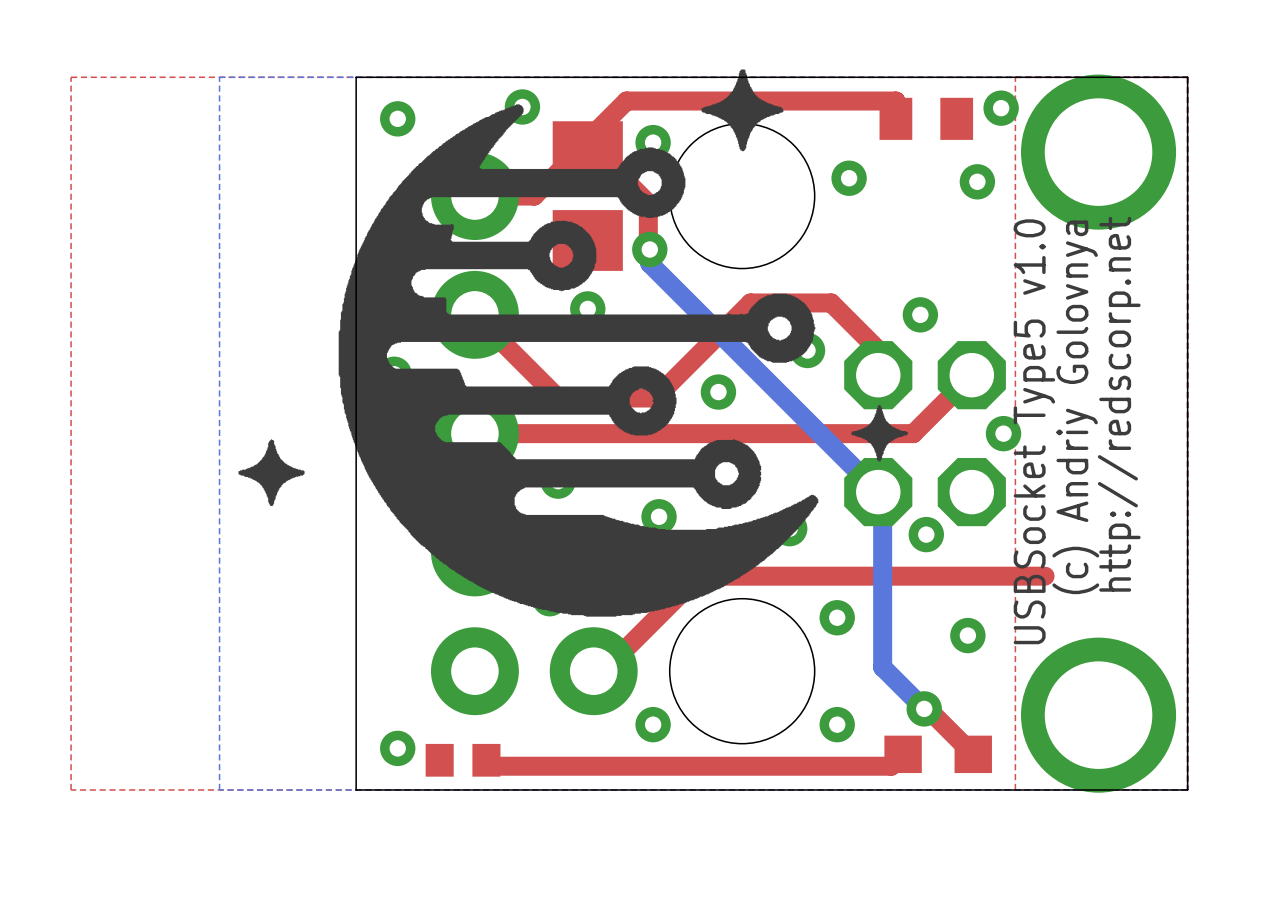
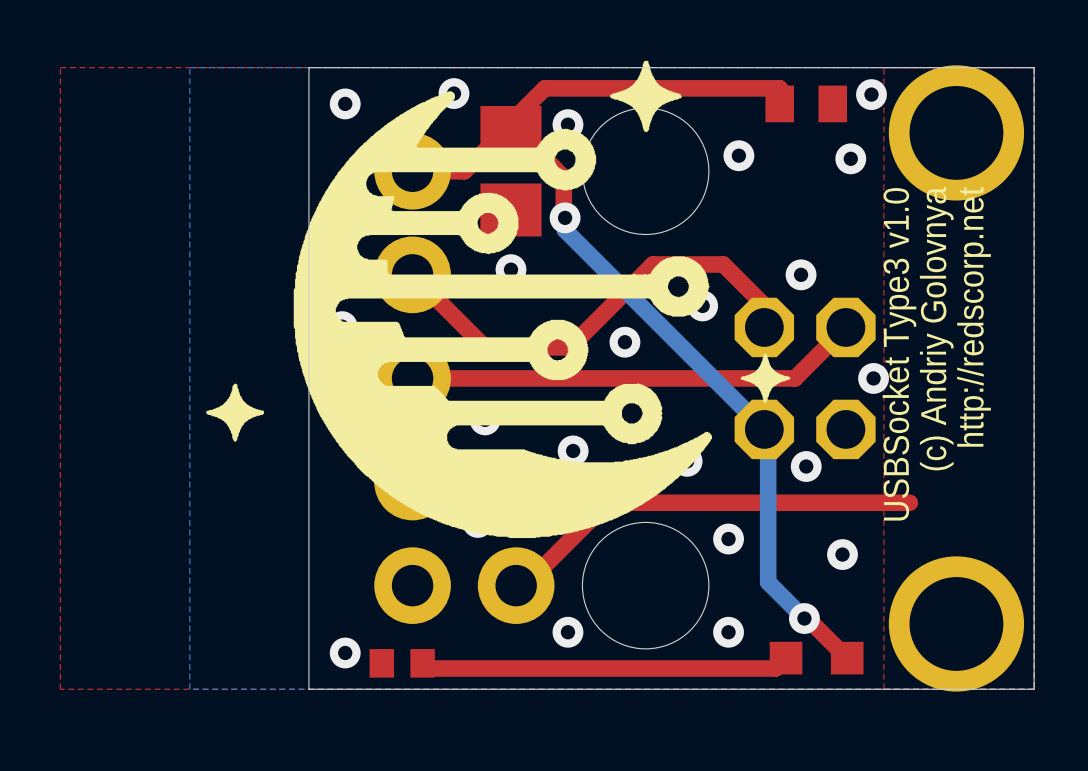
text: USBSocket Type5 v1.0 (1034, 431) -> USBSocket Type3 v1.0 (899, 354)

